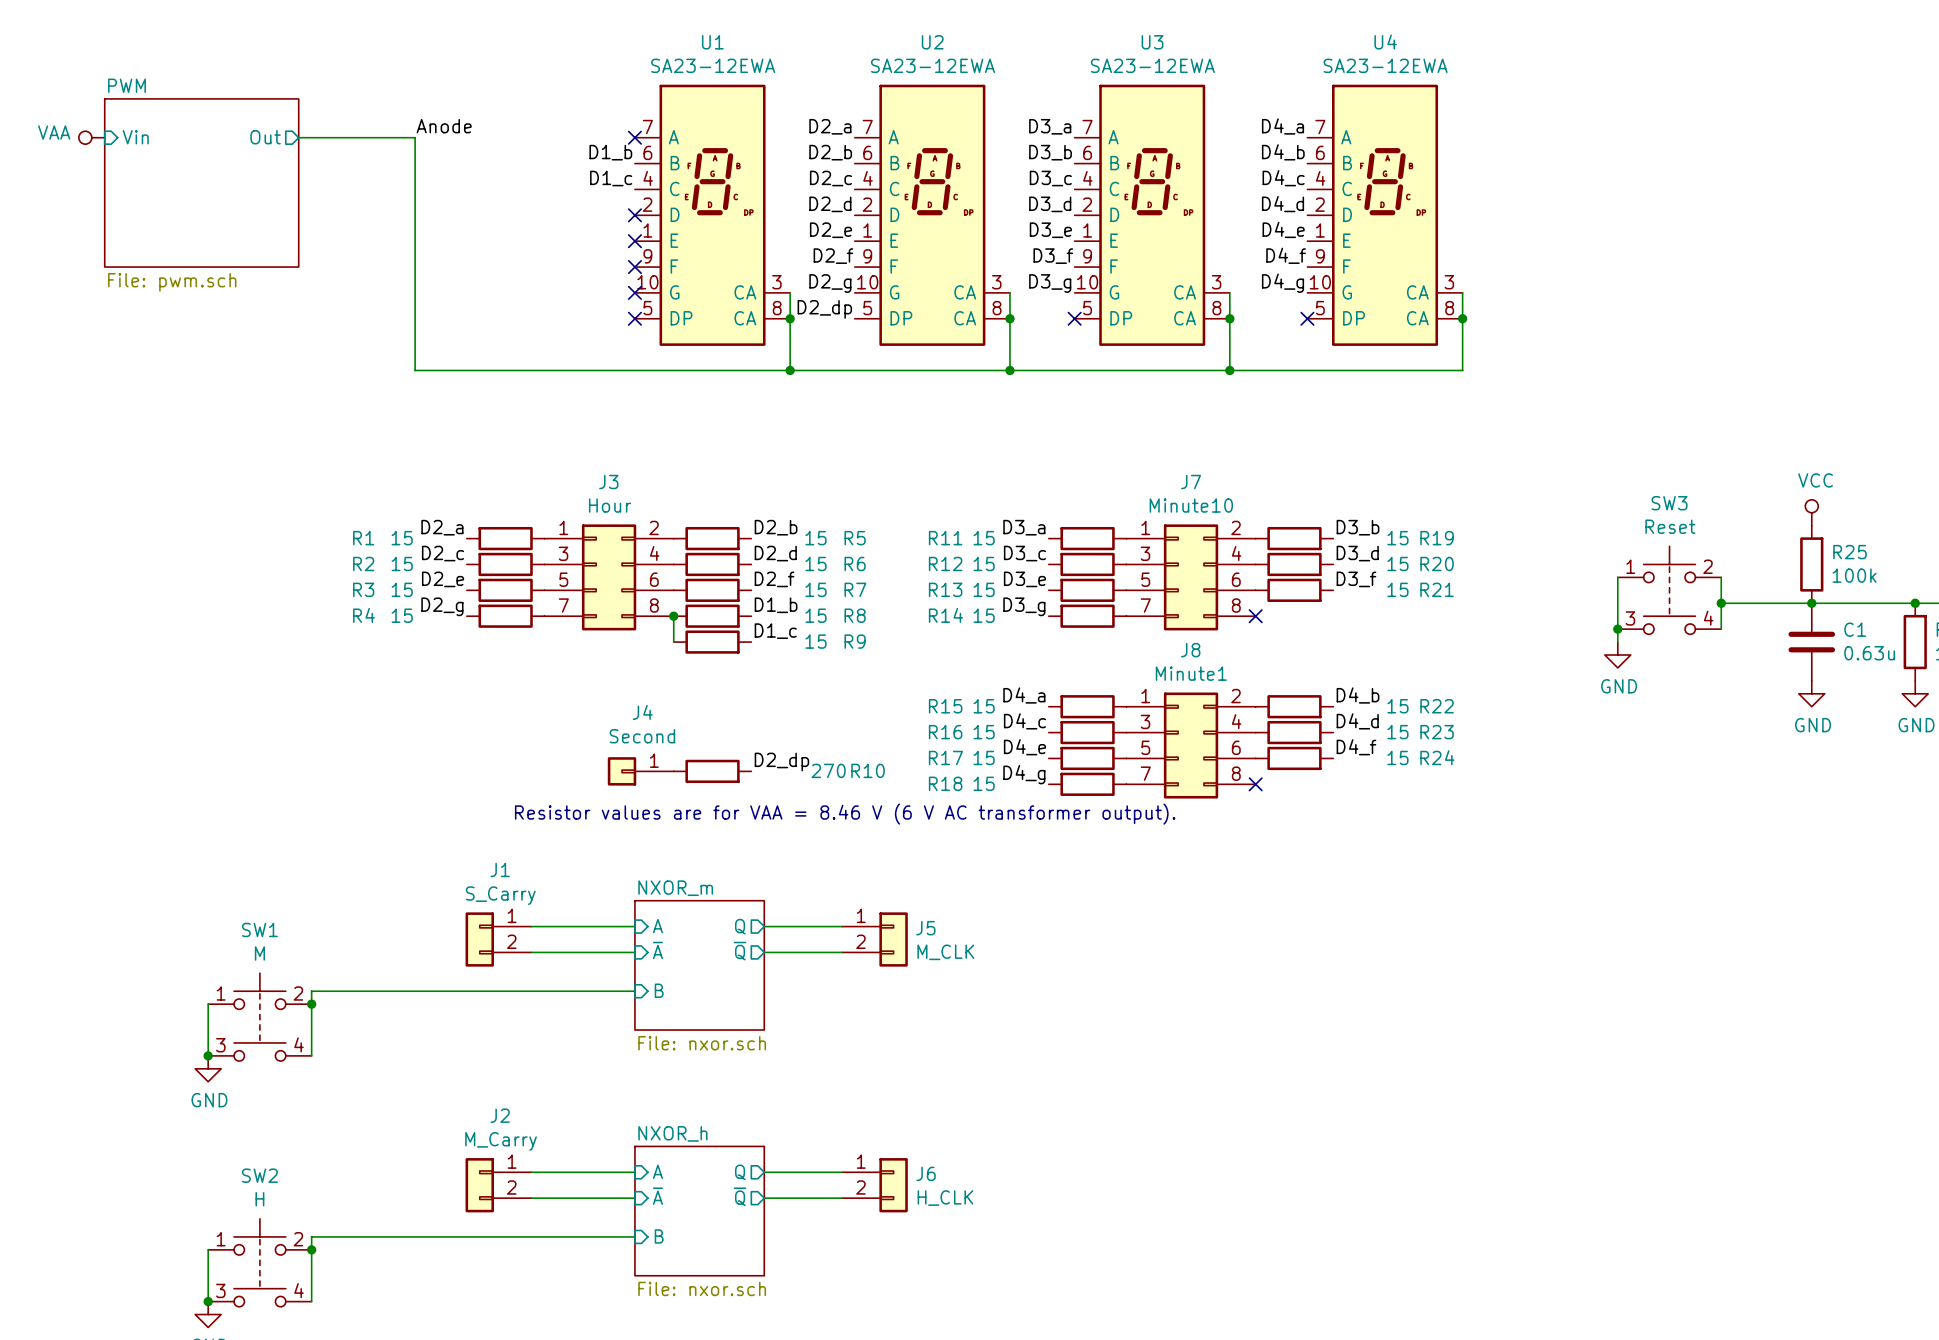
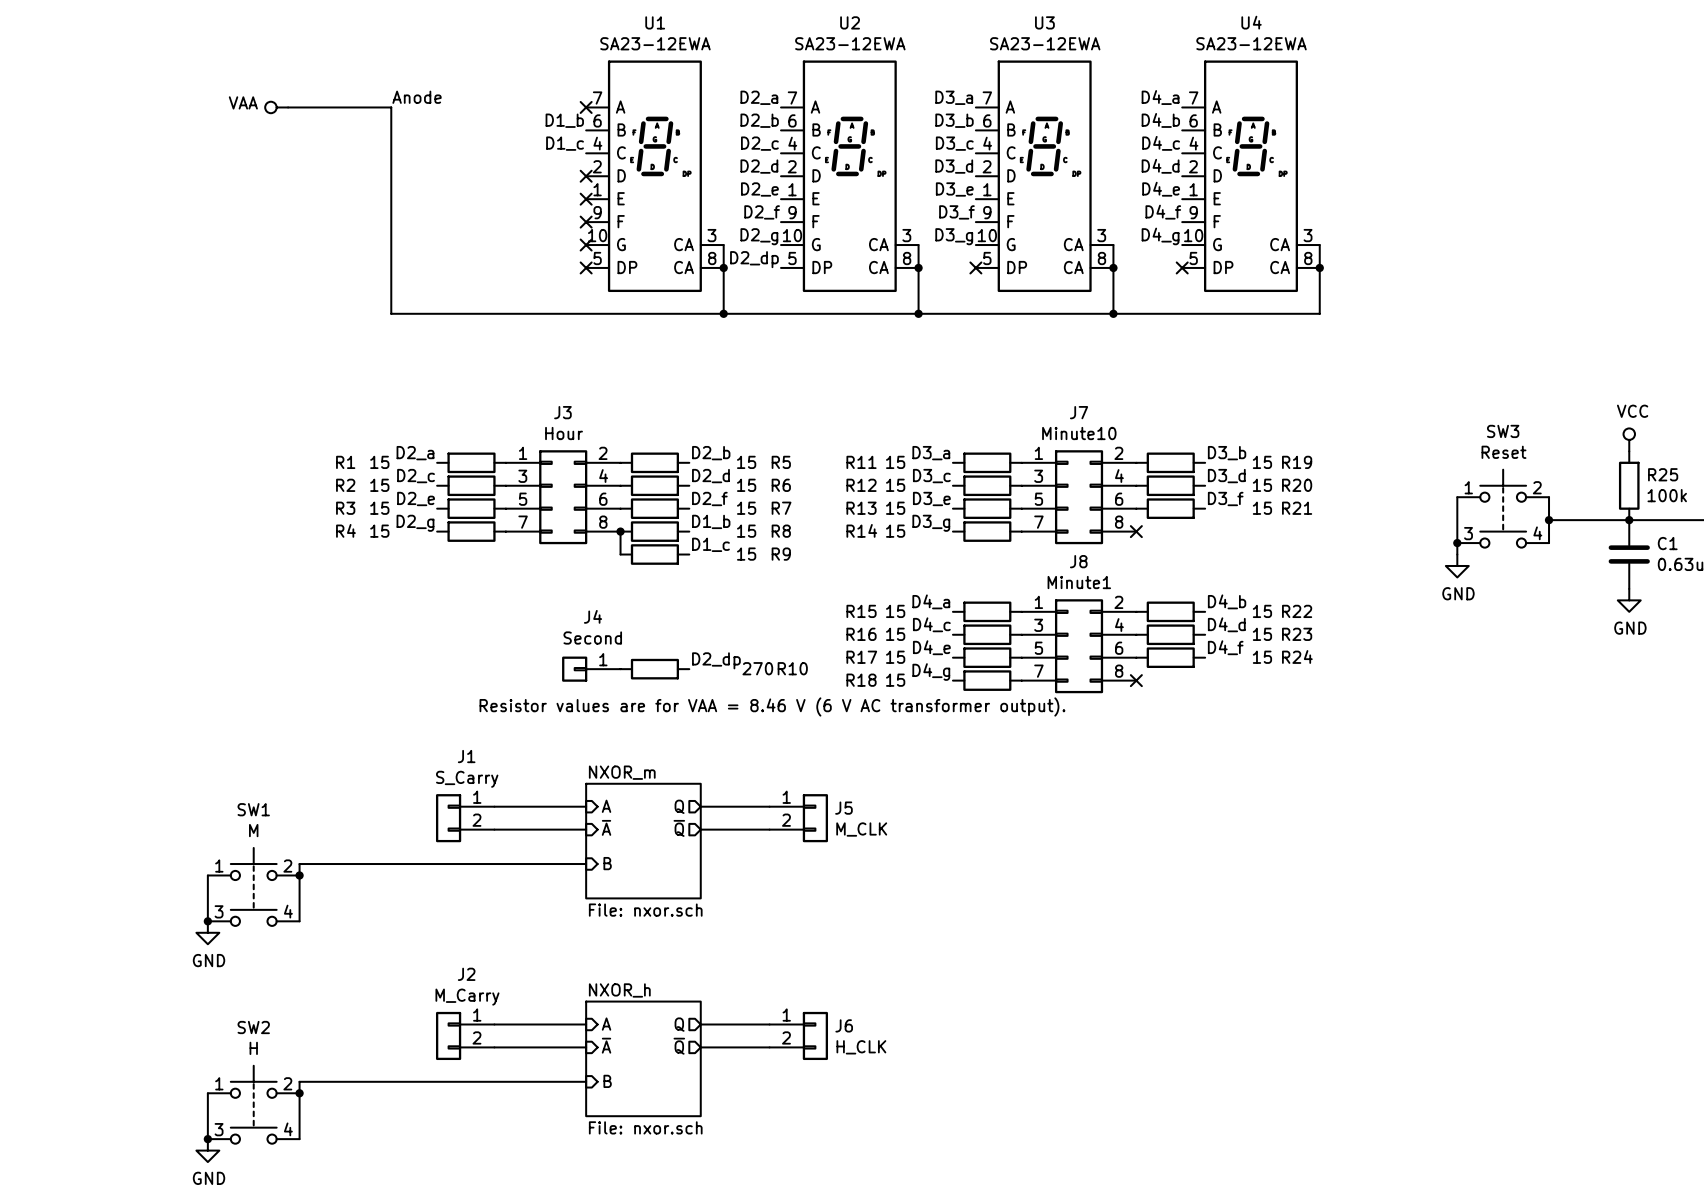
power symbol position: VAA (91, 137) -> VAA (276, 107)
sheet pin: Vin (135, 137) -> none
sheet pin: Out (265, 137) -> none
sheet PWM: File: pwm.sch (201, 182) -> none

